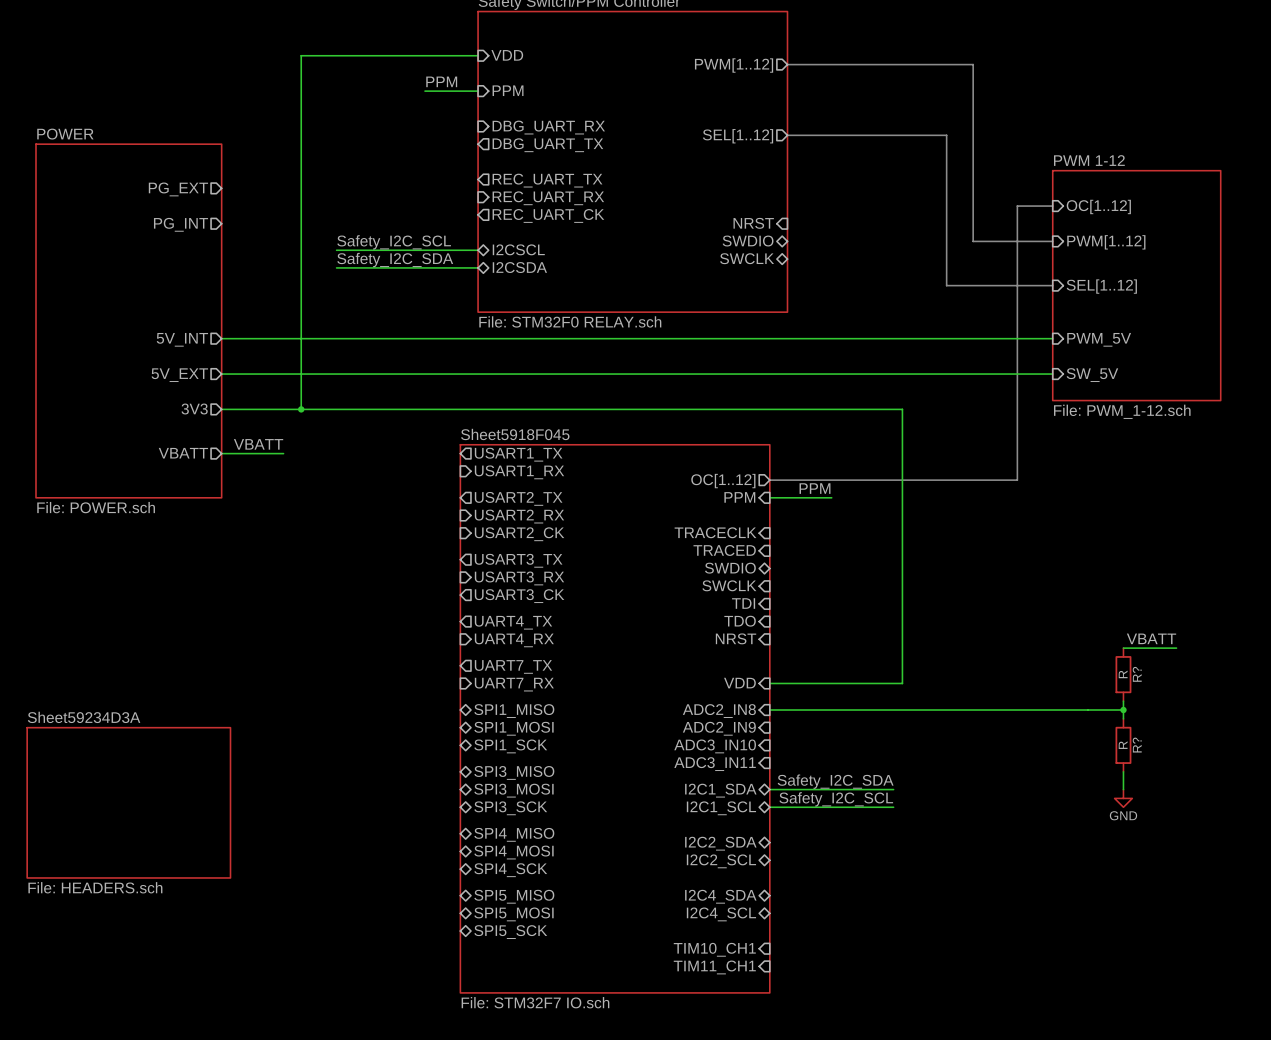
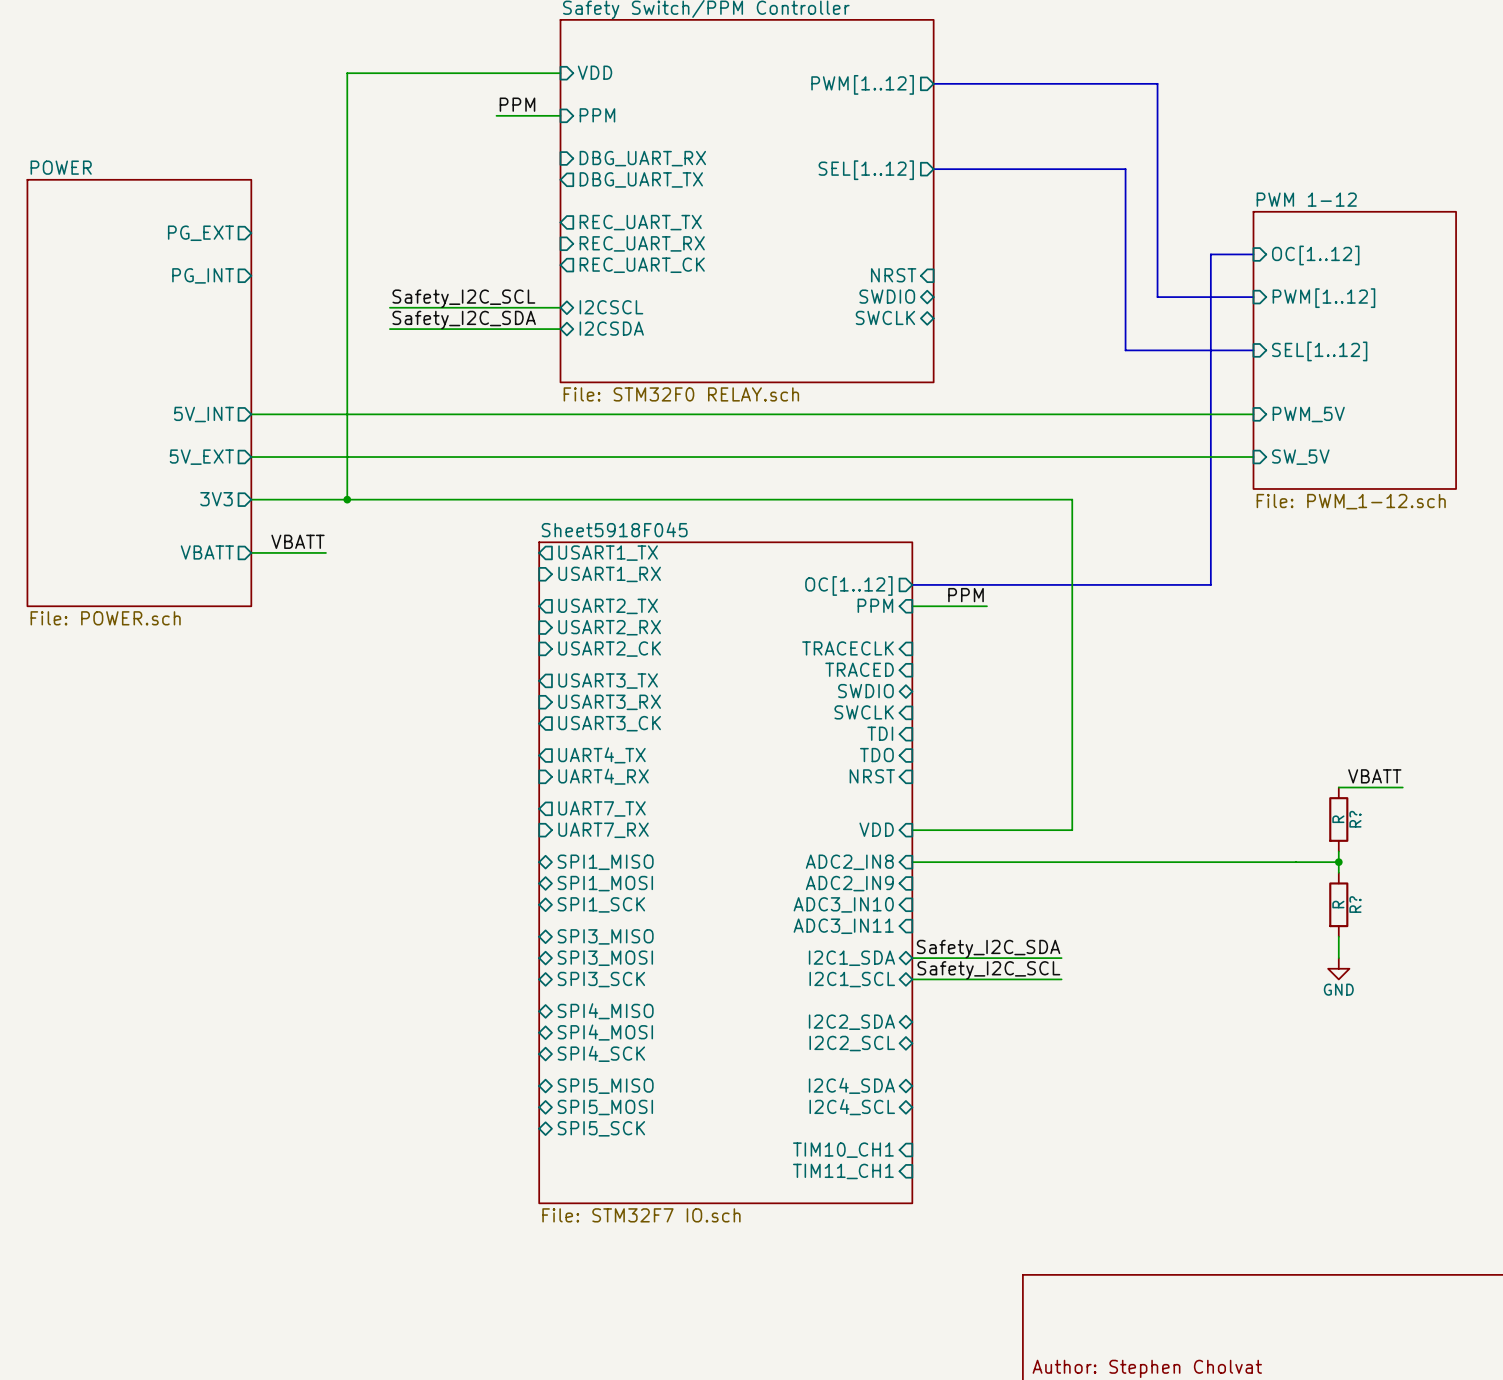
sheet Sheet59234D3A: File: HEADERS.sch (128, 802) -> none

